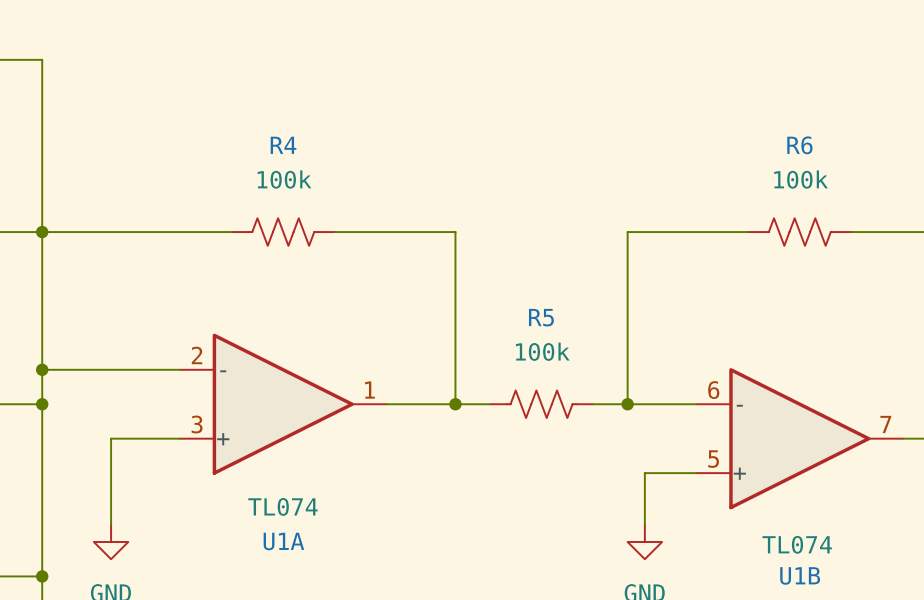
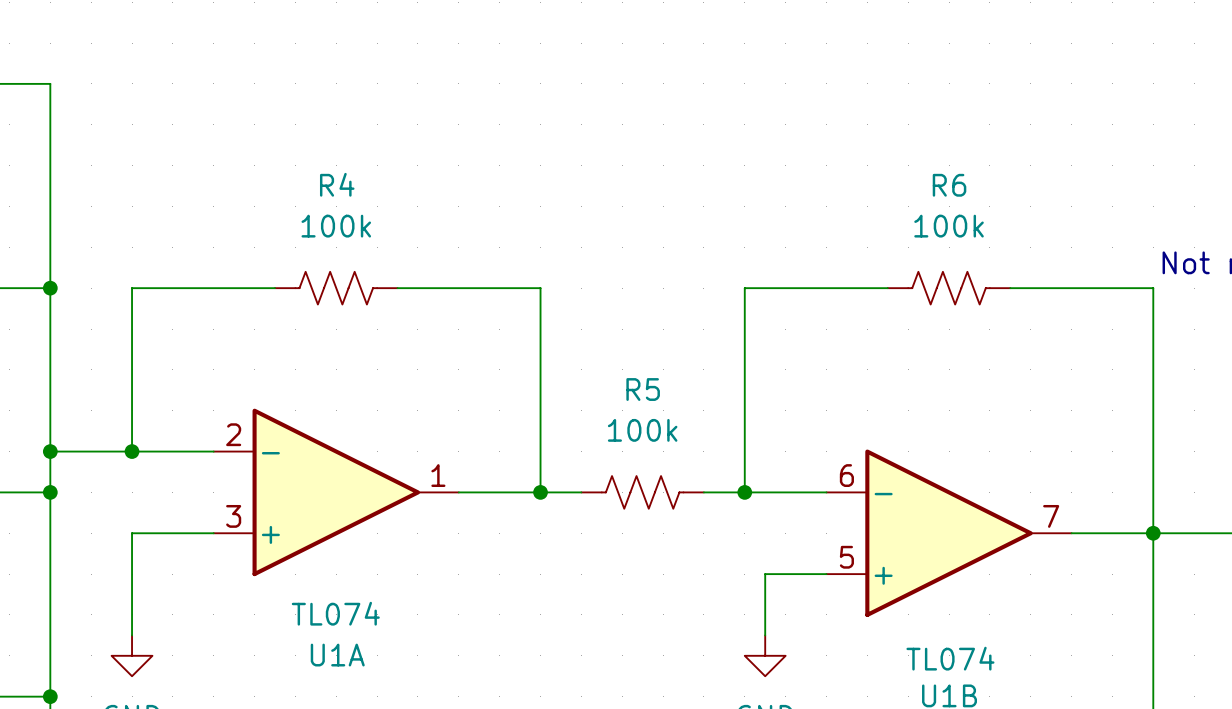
wire: (42, 232) (111, 232) -> (132, 451) (132, 288)
junction: none -> (132, 451)

